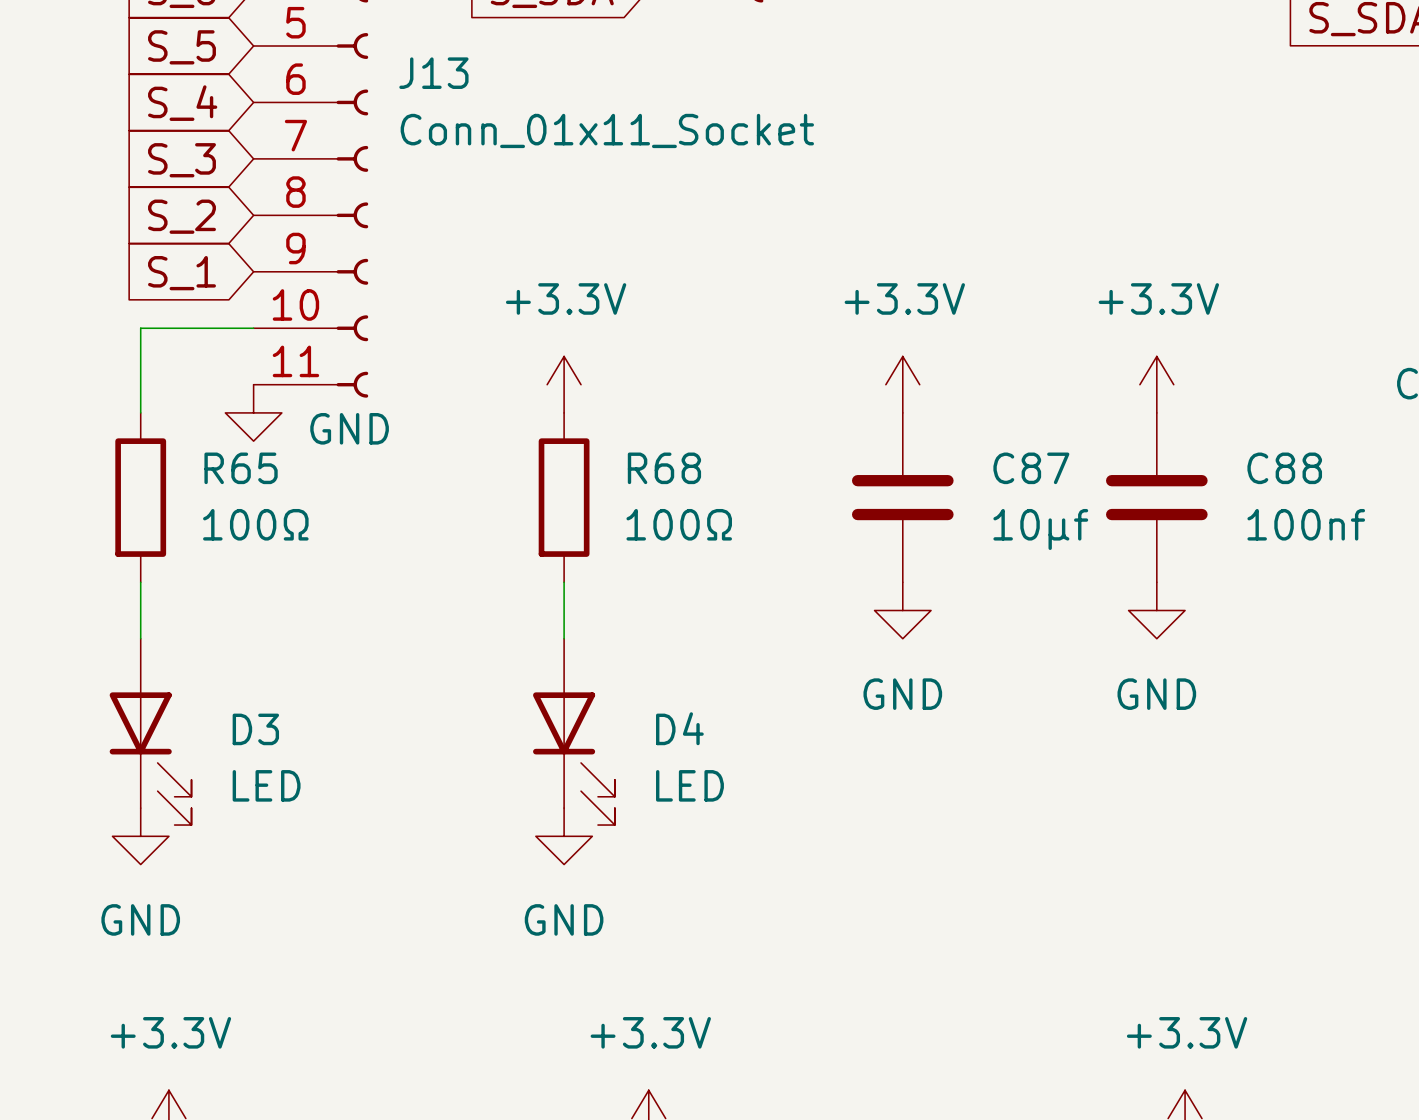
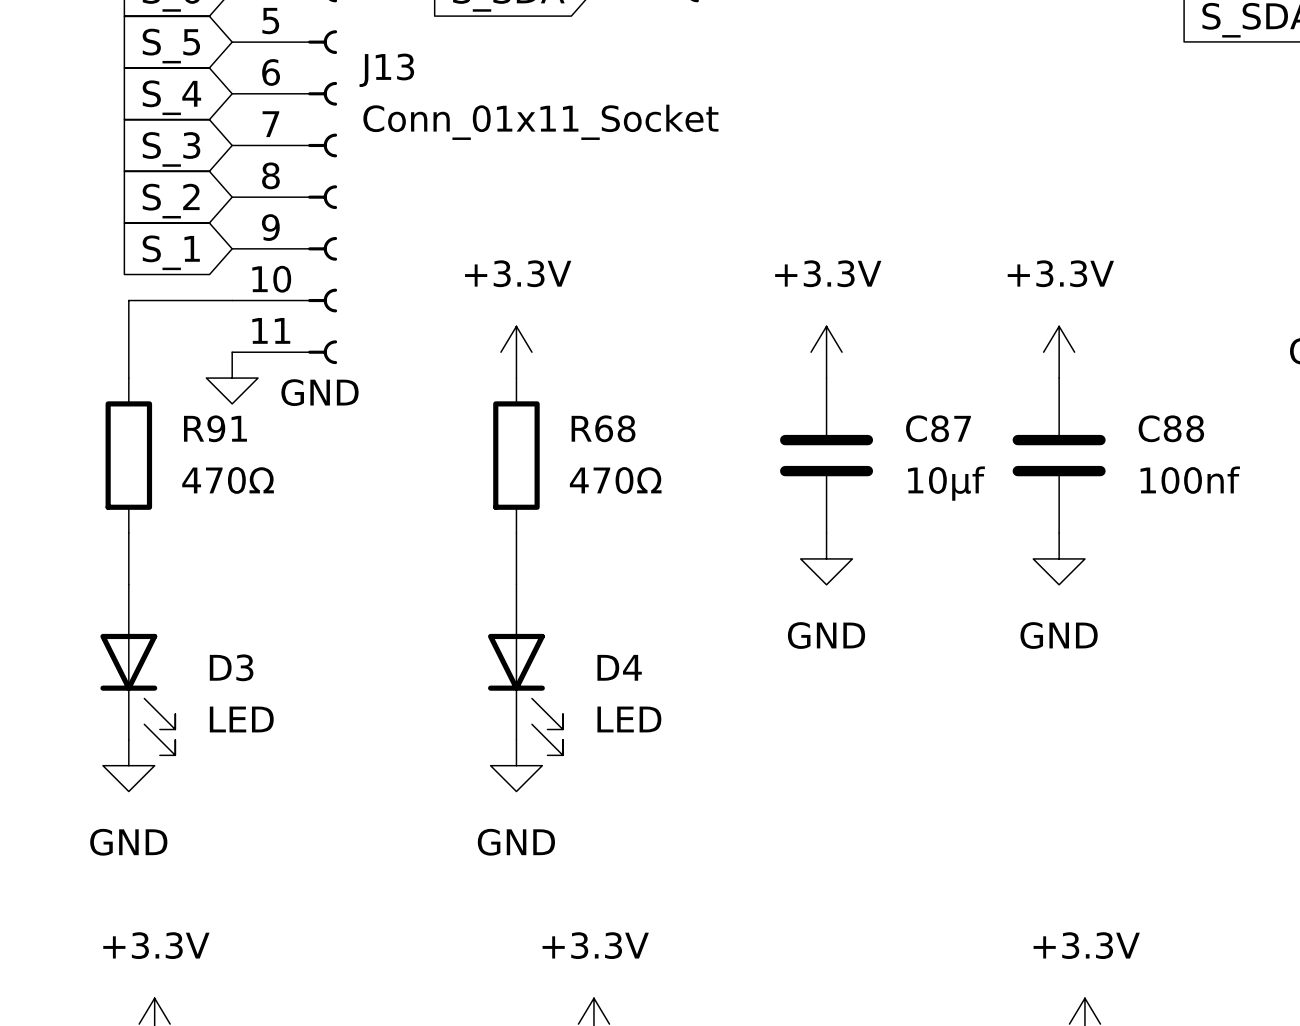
R65 name: R65 (241, 468) -> R91 (215, 428)
R65 value: 100Ω (255, 524) -> 470Ω (228, 480)
R68 value: 100Ω (679, 524) -> 470Ω (615, 480)

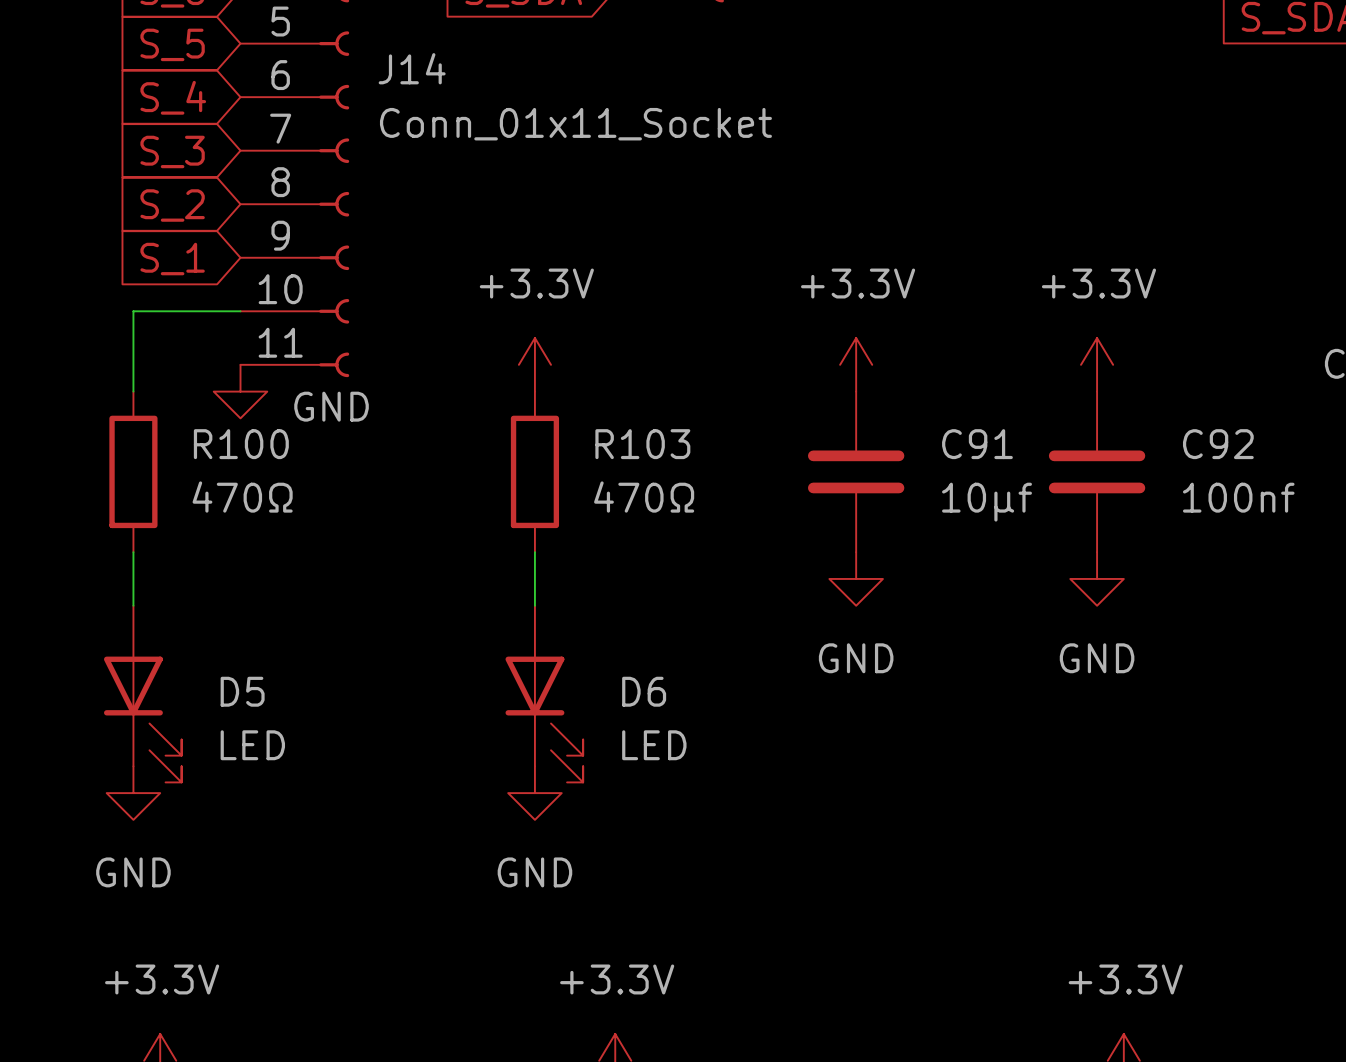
J13 name: J13 (386, 70) -> J14 (412, 68)
R91 name: R91 (215, 428) -> R100 (241, 444)
R68 name: R68 (603, 428) -> R103 (642, 444)
C87 name: C87 (938, 428) -> C91 (977, 444)
C88 name: C88 (1171, 428) -> C92 (1218, 444)
D3 name: D3 (231, 667) -> D5 (242, 691)
D4 name: D4 (619, 667) -> D6 (644, 691)

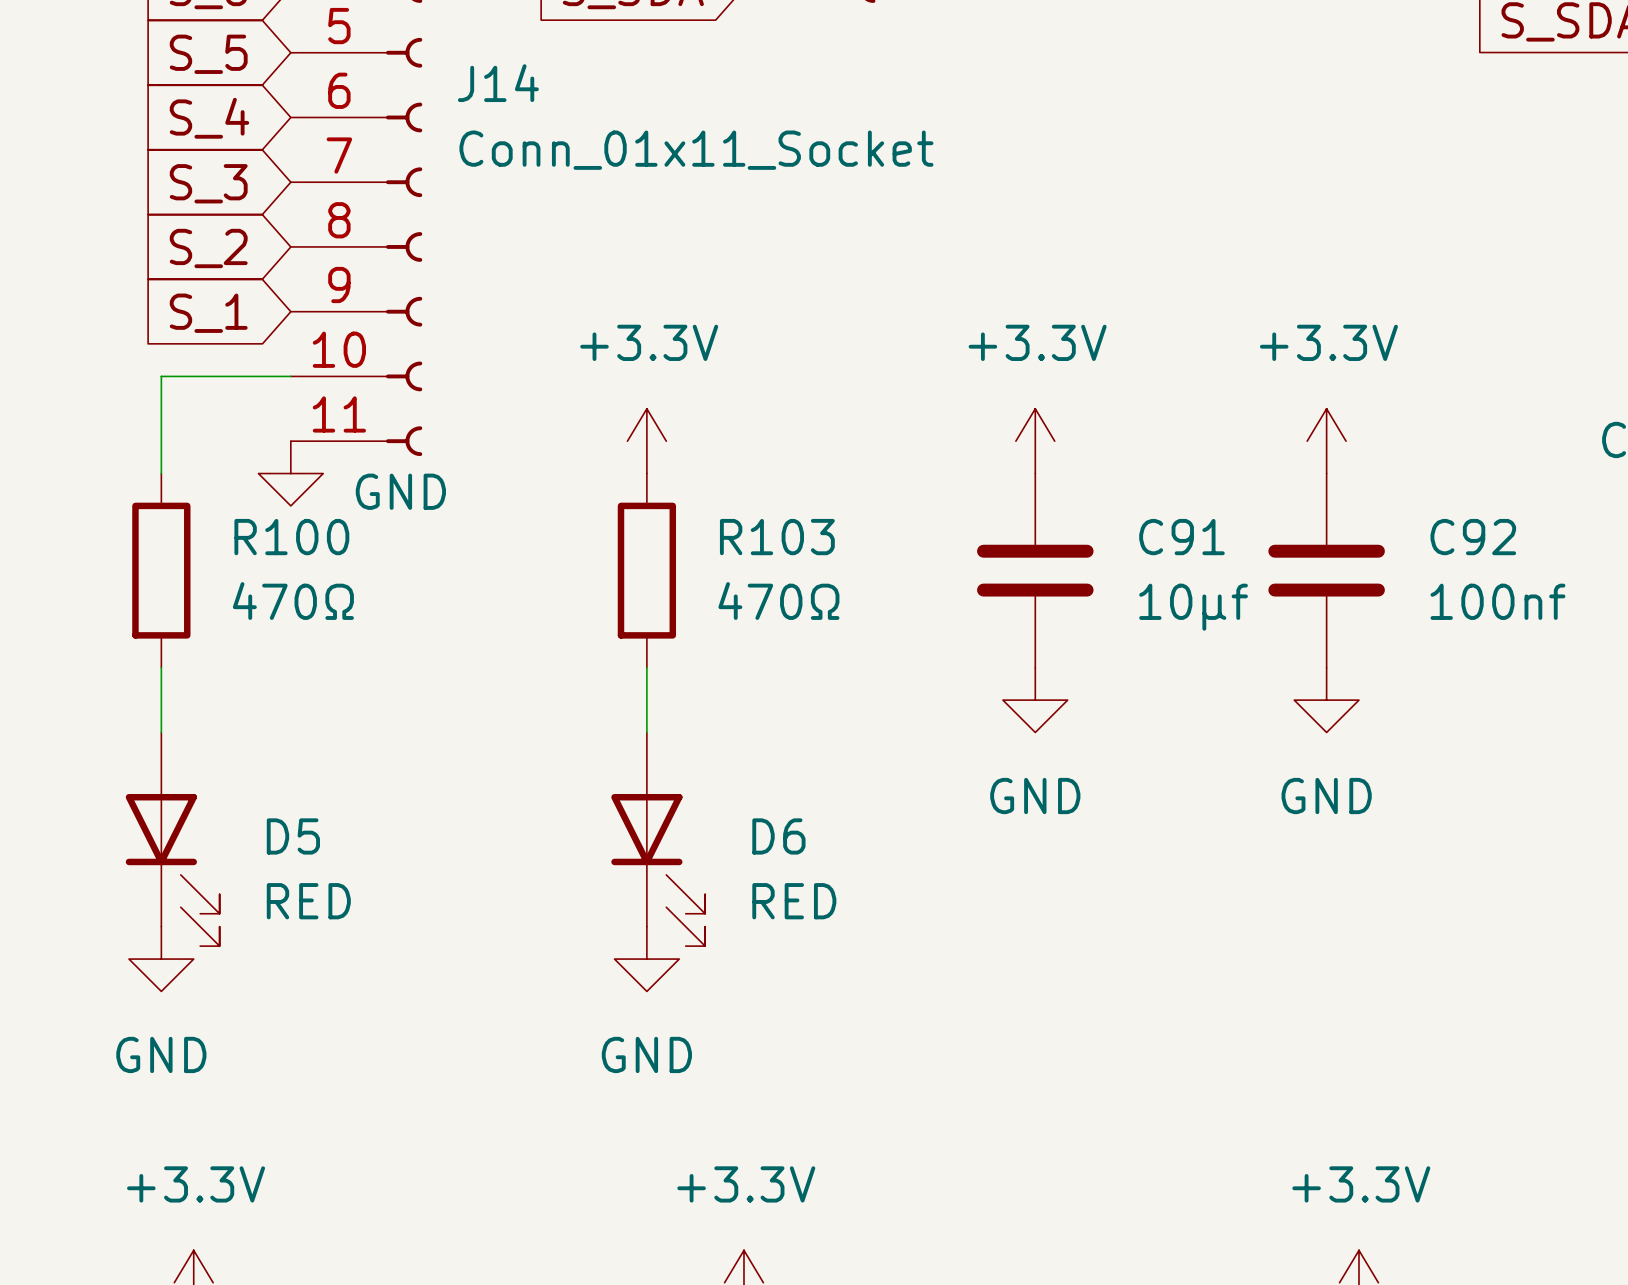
D5 value: LED (252, 745) -> RED (308, 901)
D6 value: LED (654, 745) -> RED (794, 901)

